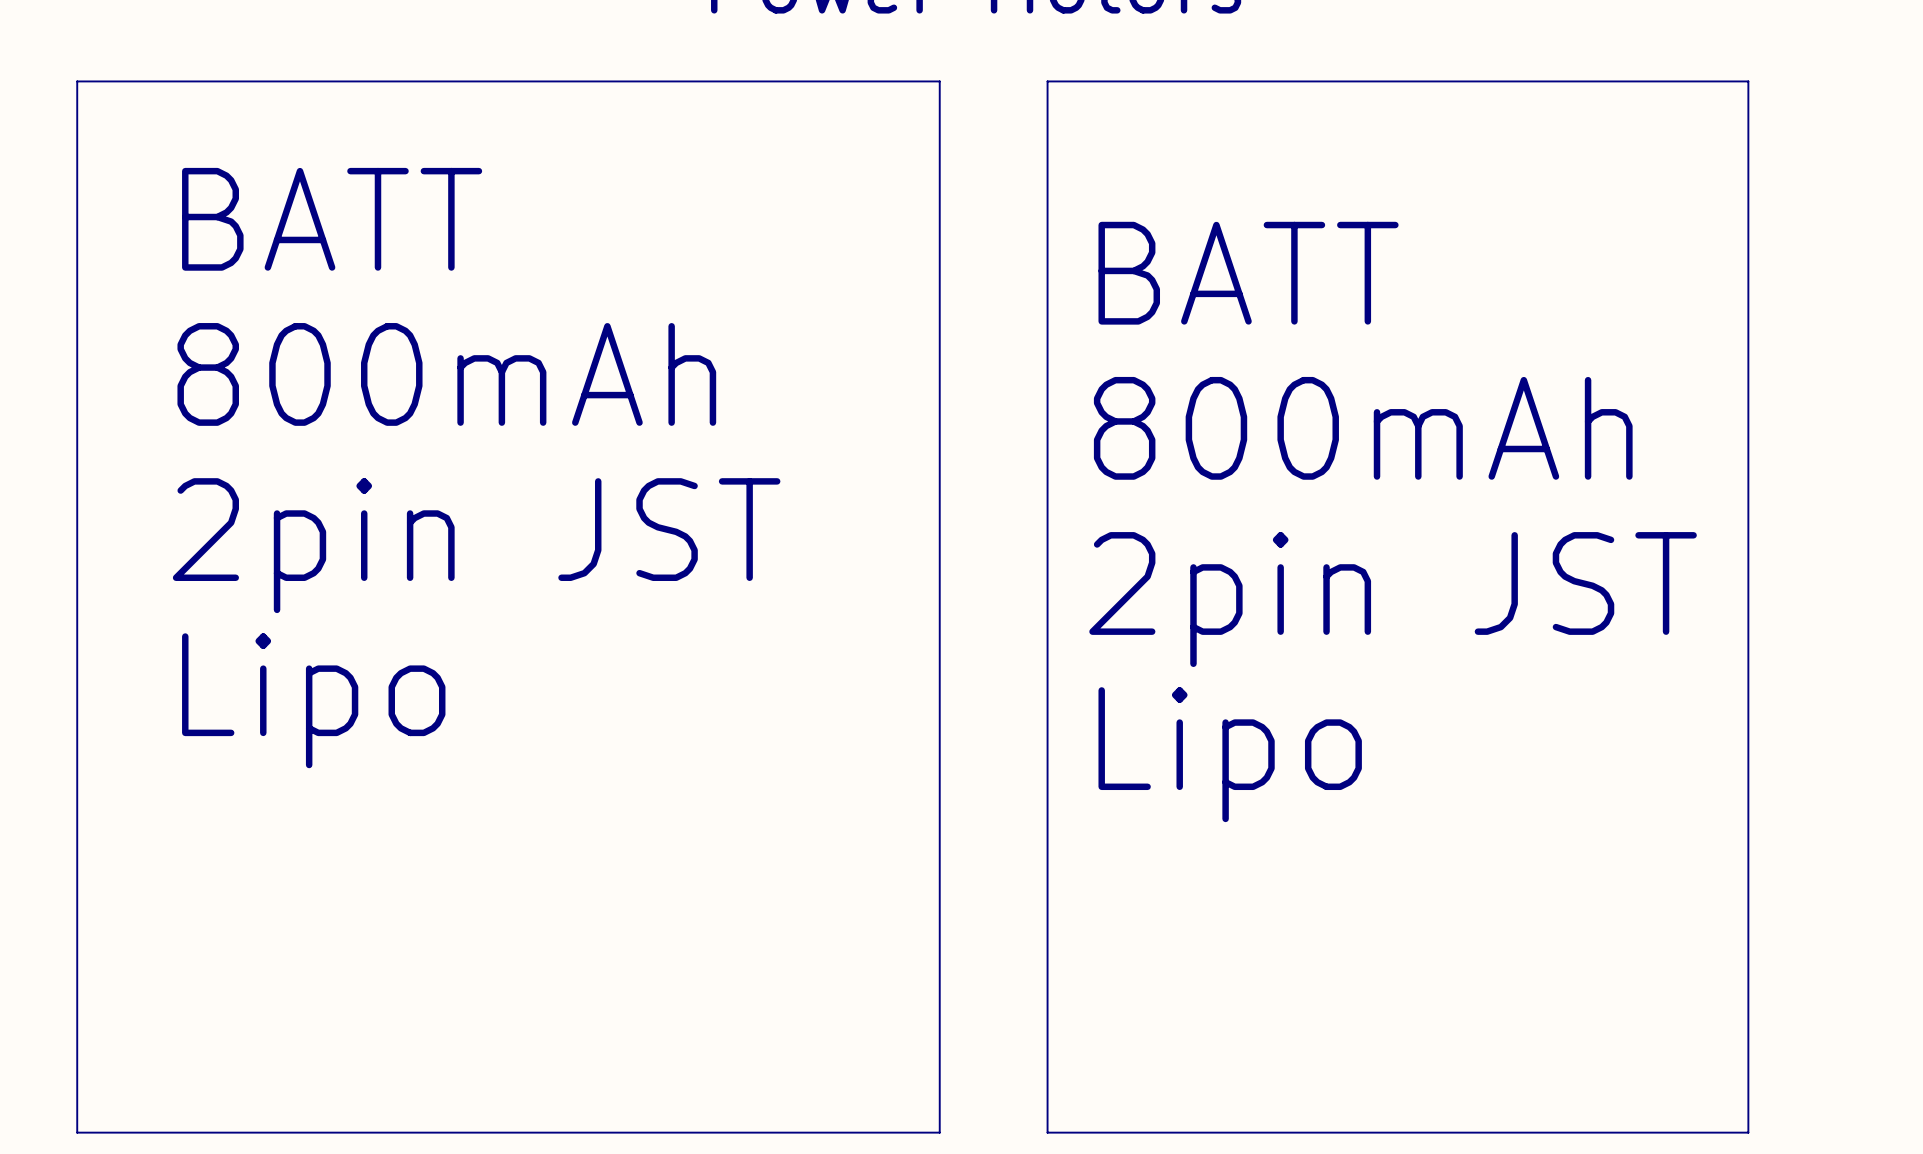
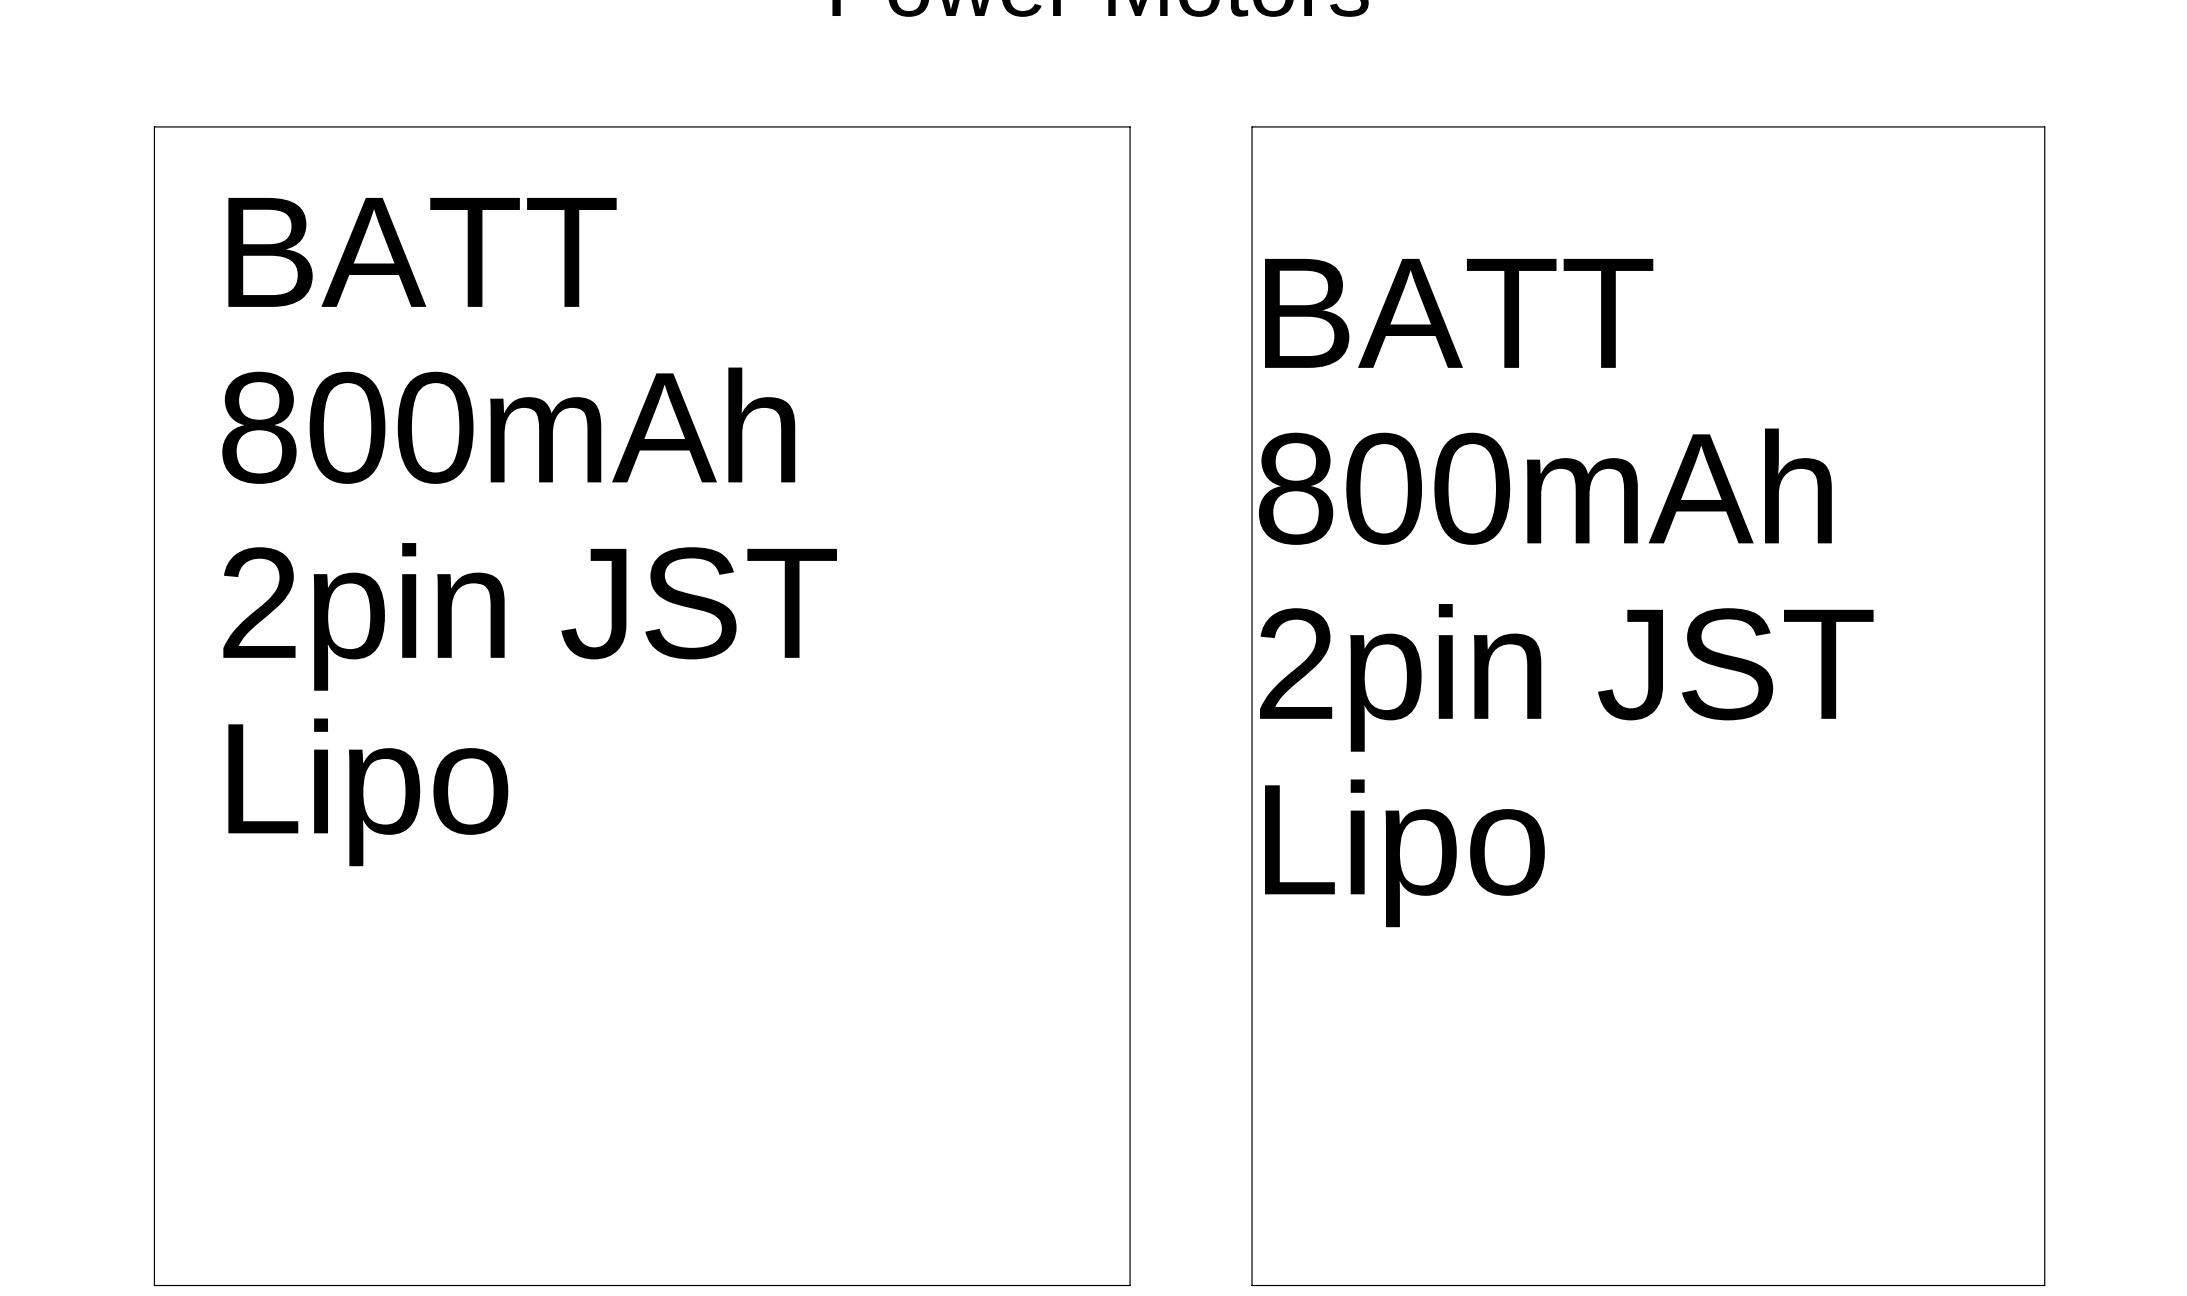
line: (104, 1132) (77, 1132) (77, 81) (939, 81) (939, 1132) -> (154, 1285) (154, 126) (1130, 126) (1130, 1285) (1099, 1285)
line: (1074, 1132) (1047, 1132) (1047, 81) (1748, 81) (1748, 1132) -> (1252, 1285) (1252, 126) (2044, 126) (2044, 1285) (2014, 1285)

